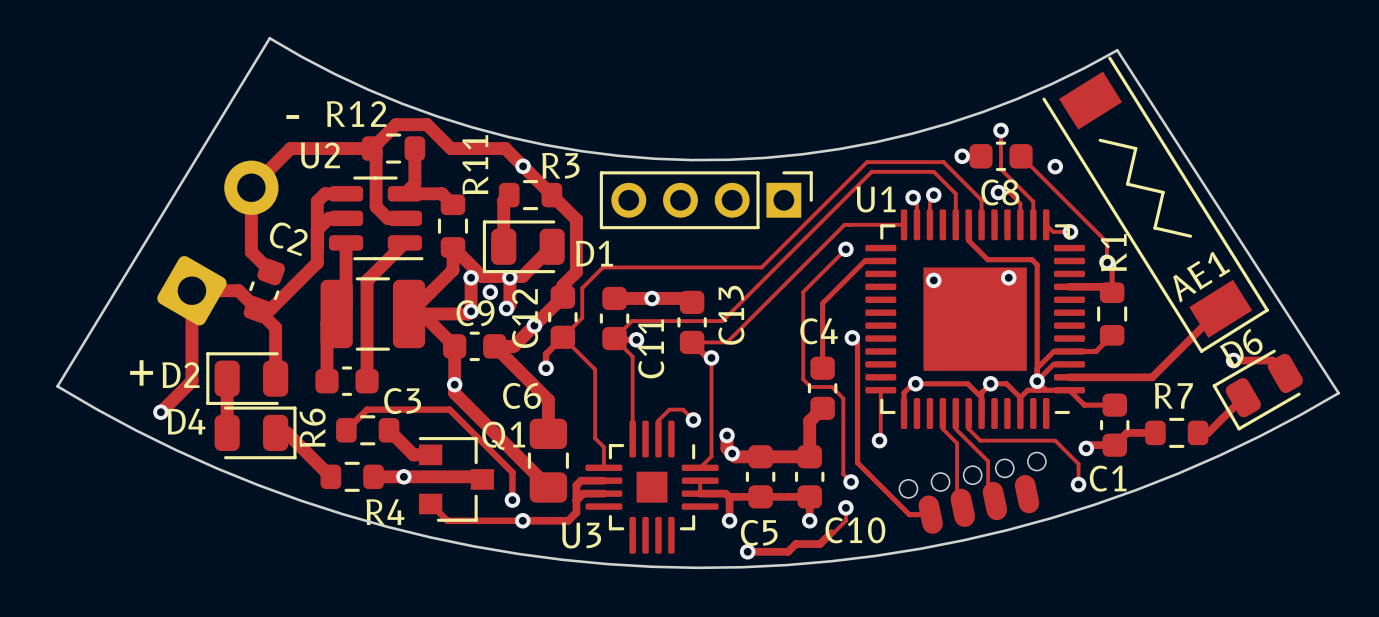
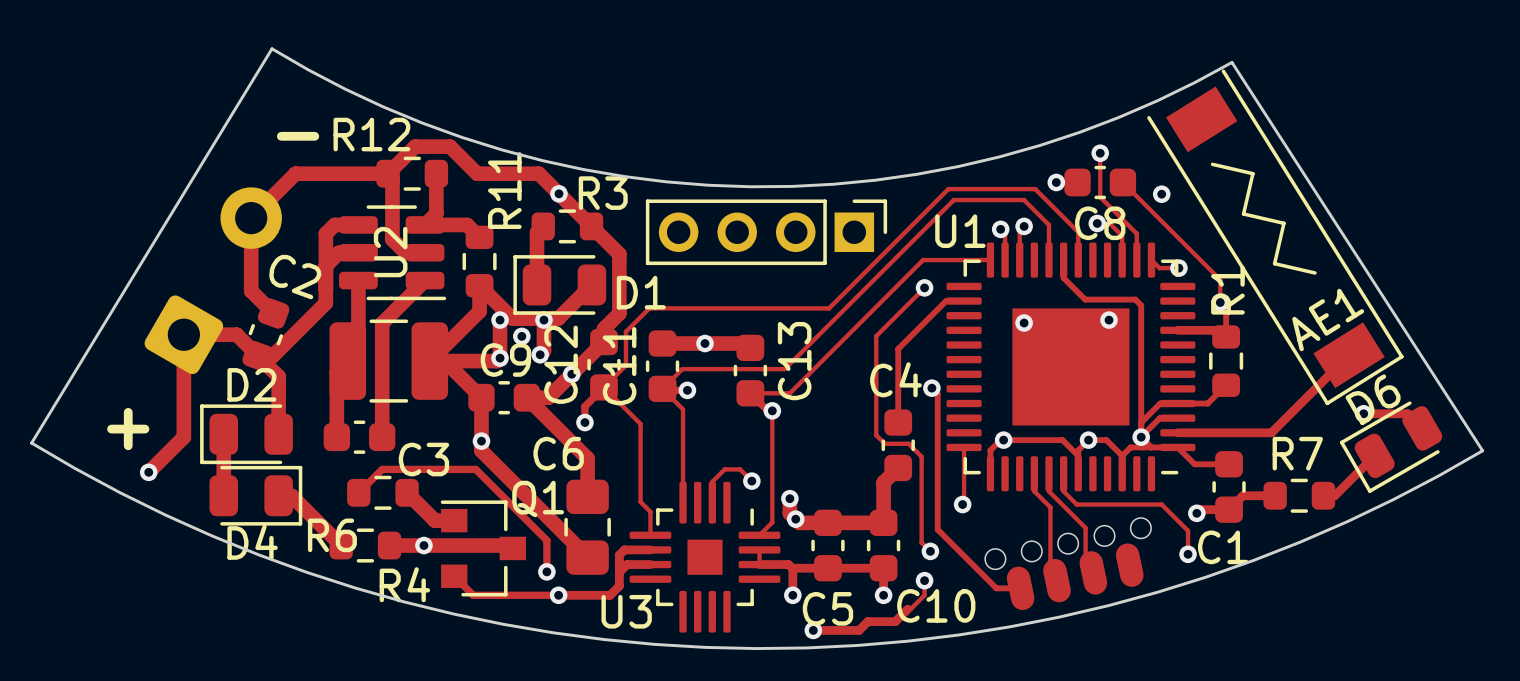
U2 name rotation: 0° (320, 155) -> 90° counterclockwise (390, 252)
U2 name position: U2 (320, 155) -> U2 (390, 252)
C11 name position: C11 (651, 348) -> C11 (619, 366)
D2 name position: D2 (180, 375) -> D2 (251, 384)
D4 name position: D4 (186, 421) -> D4 (252, 542)
R6 name rotation: 0° (312, 427) -> 90° clockwise (332, 535)

